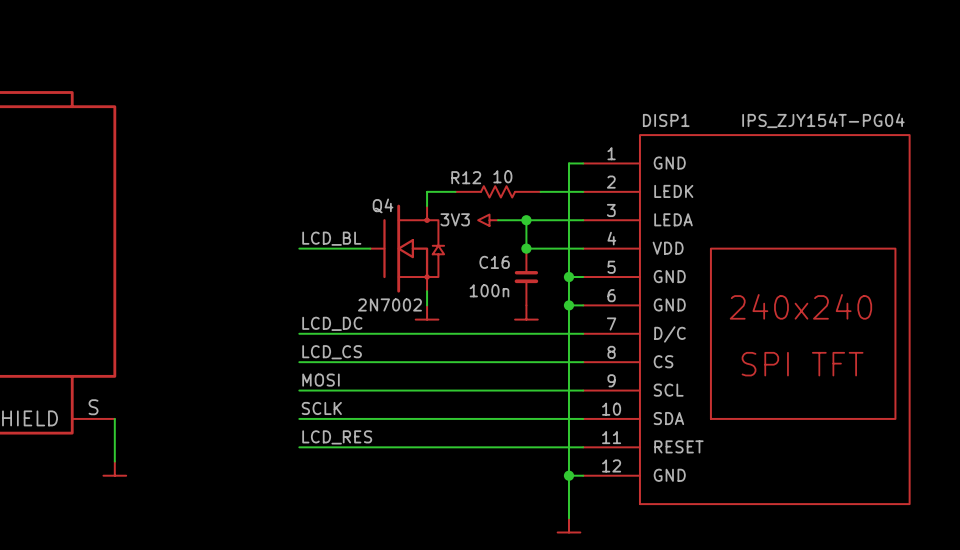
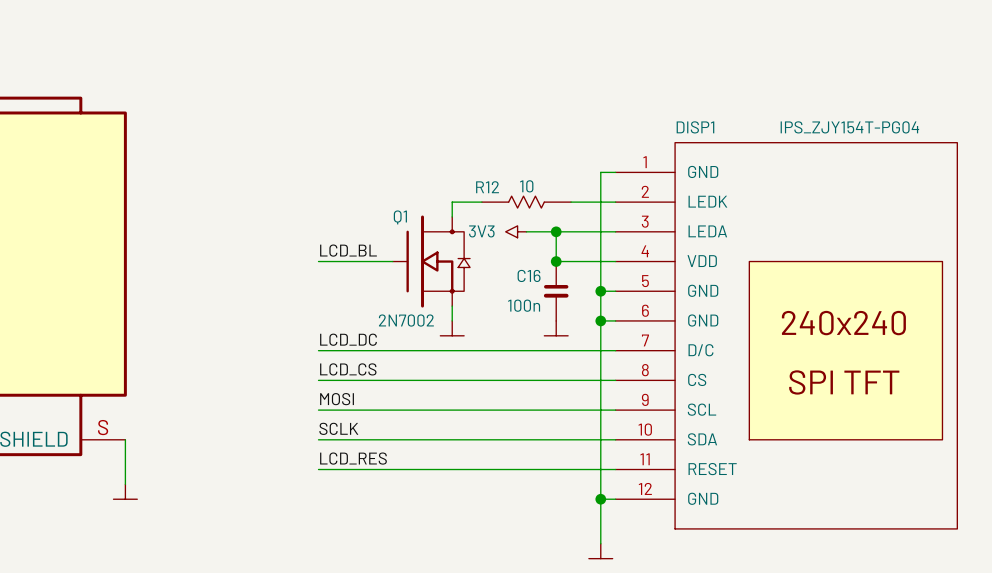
Q4 name: Q4 (383, 205) -> Q1 (400, 217)

